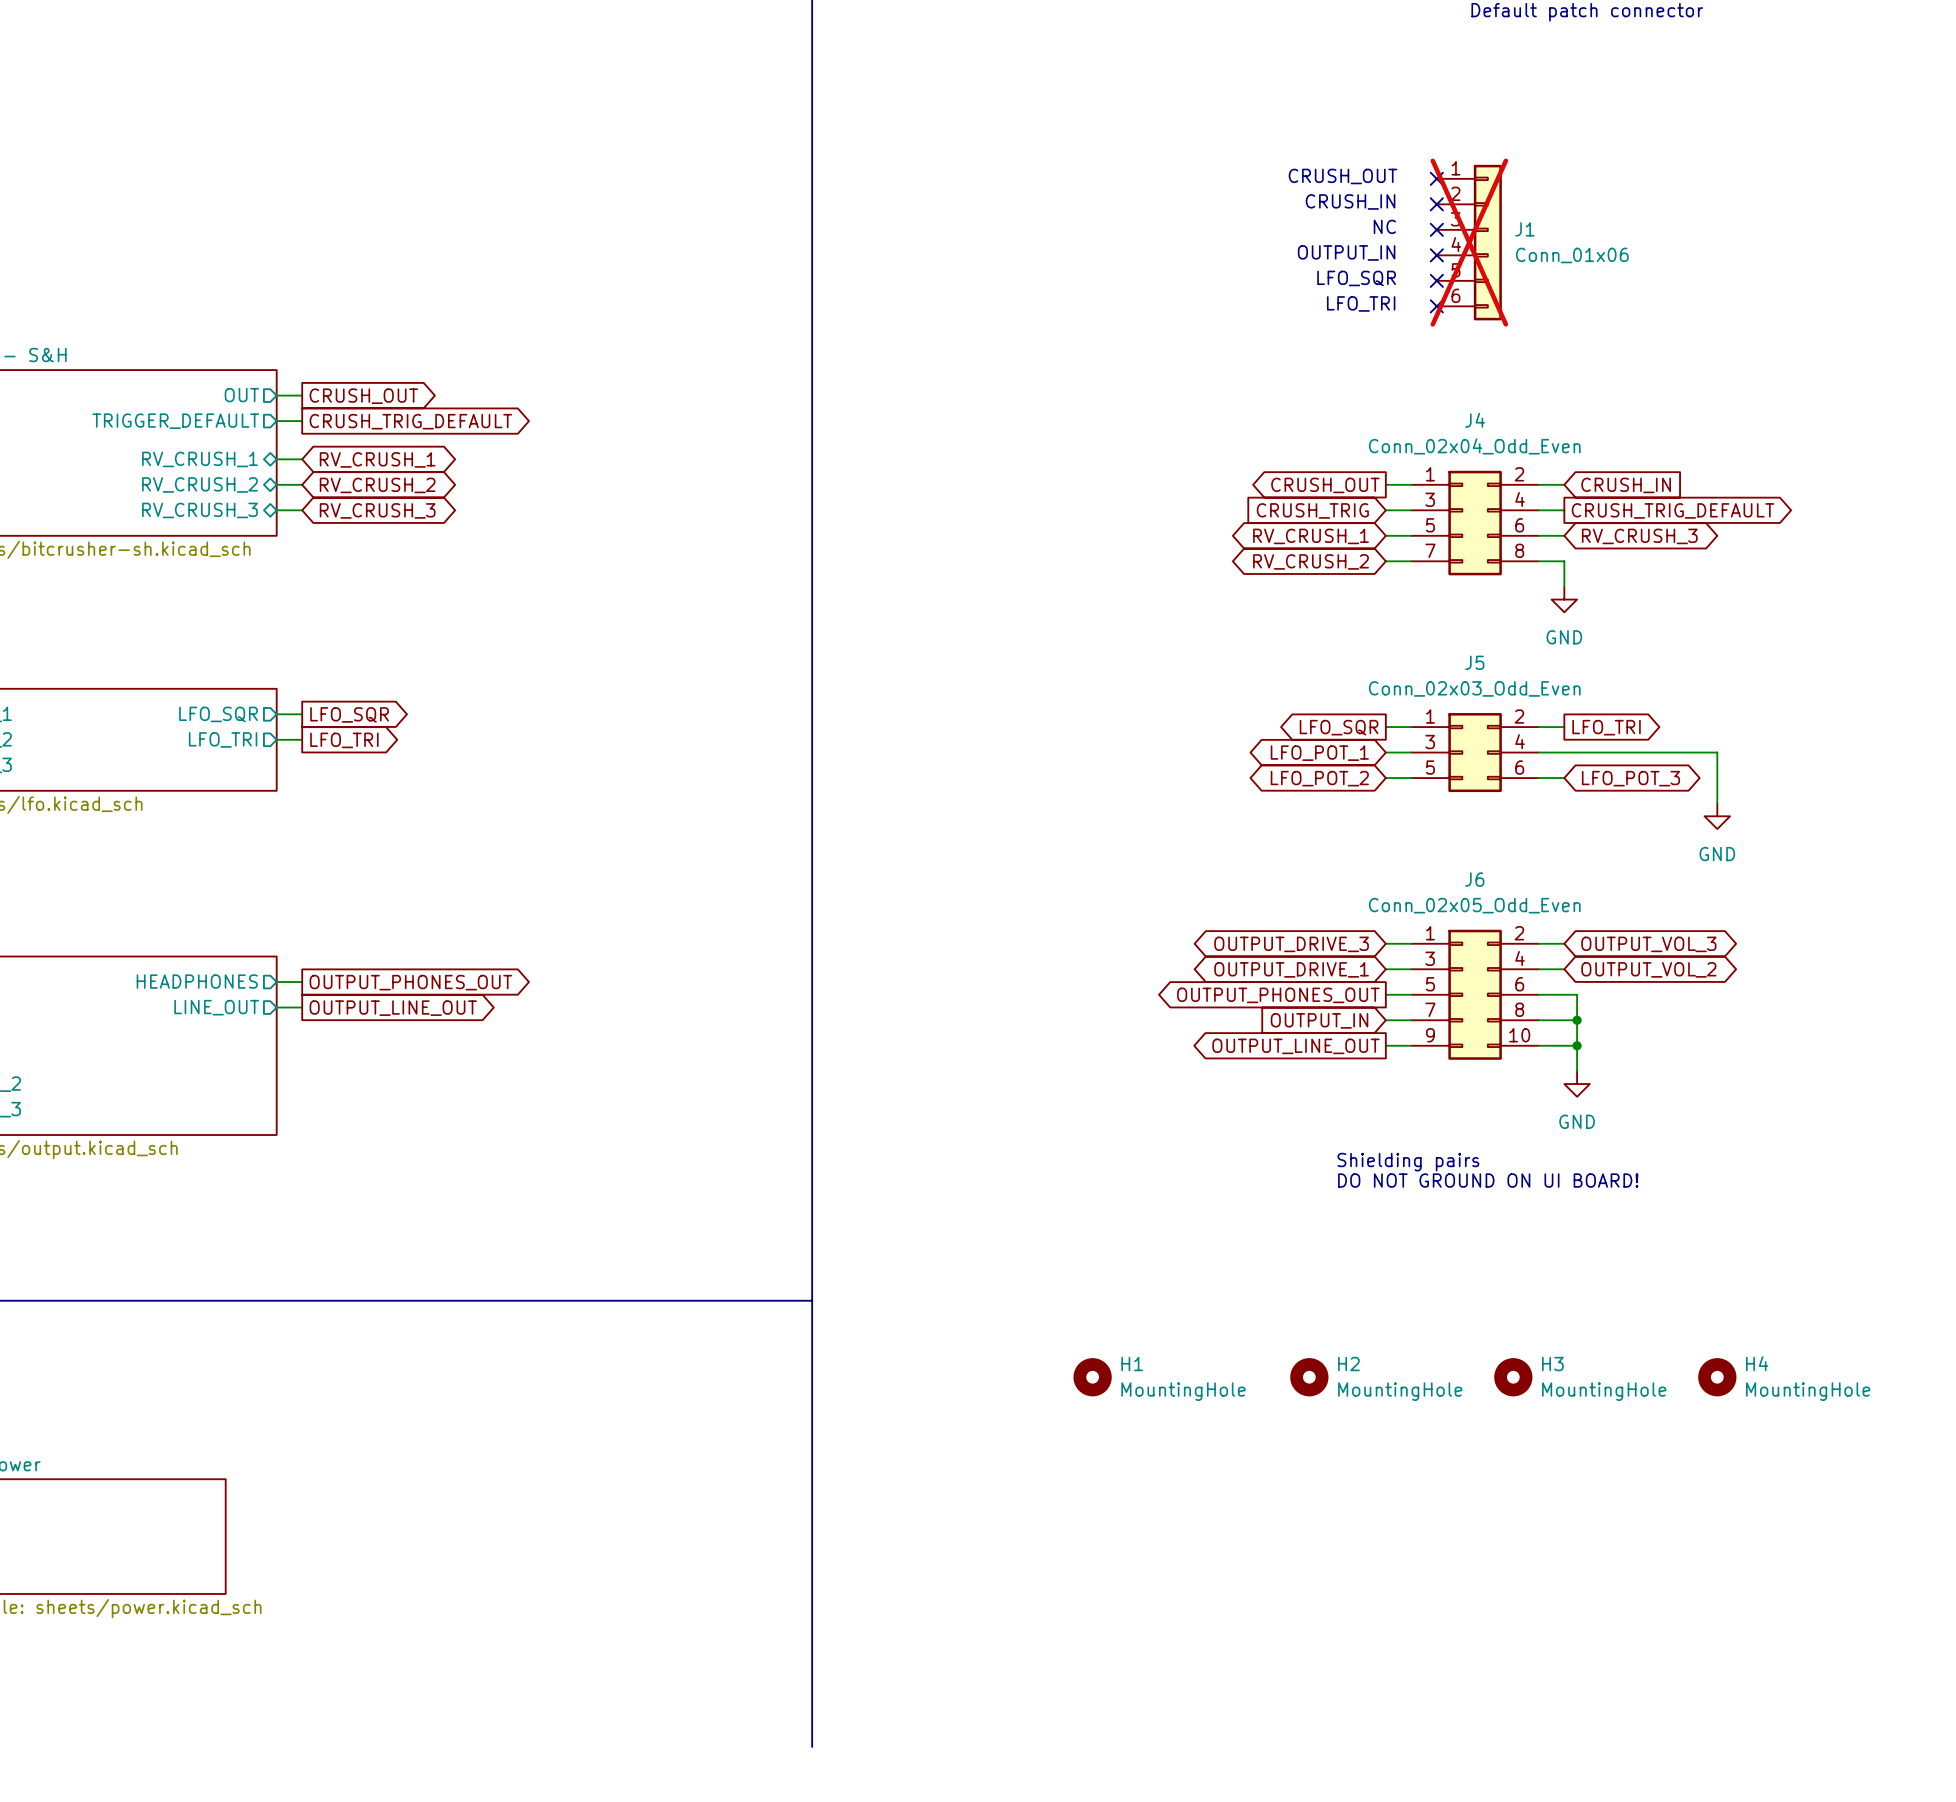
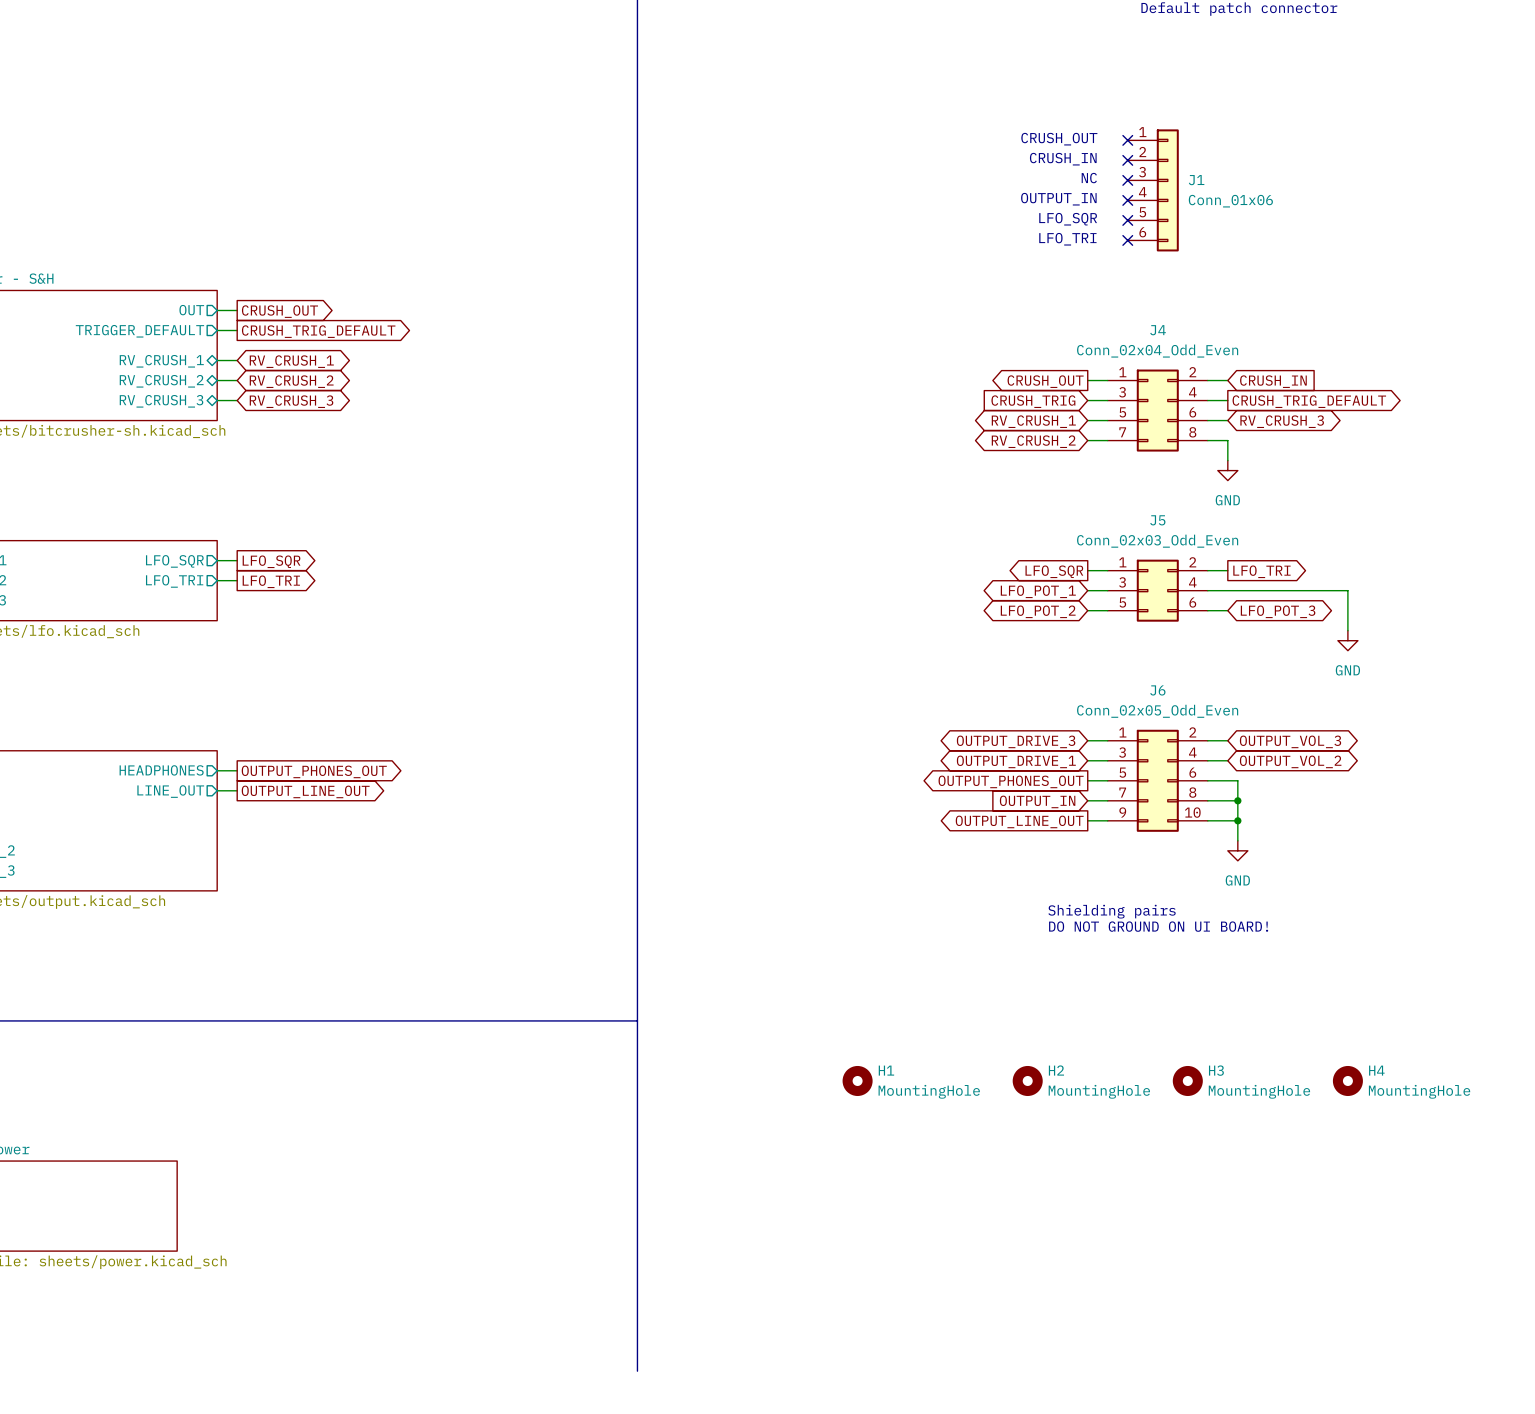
J1 do-not-place cross: (1469, 242) -> none

